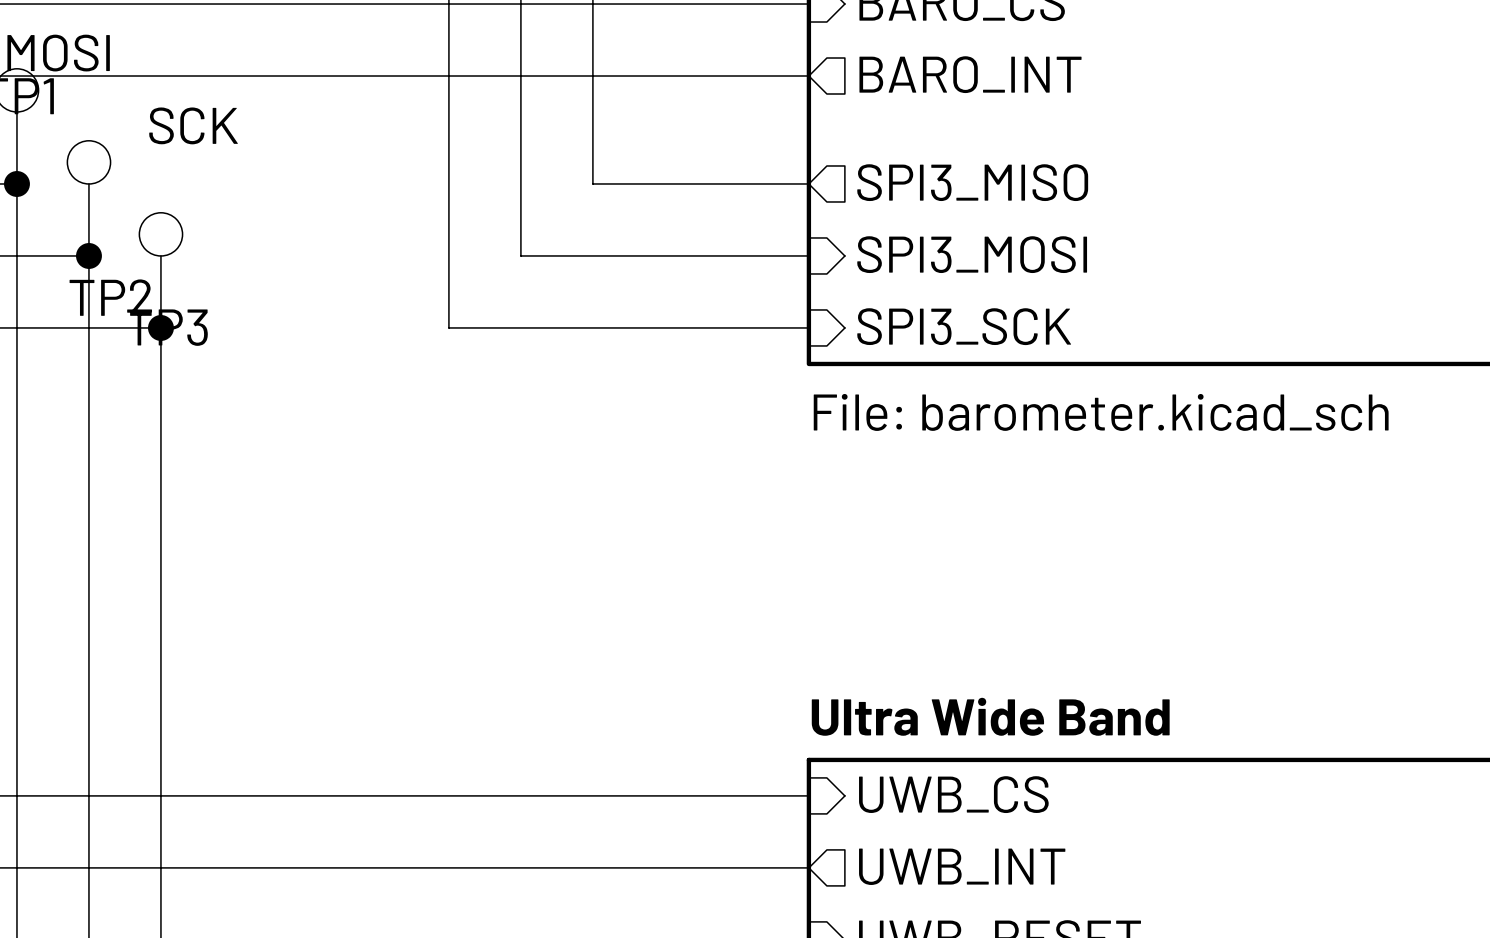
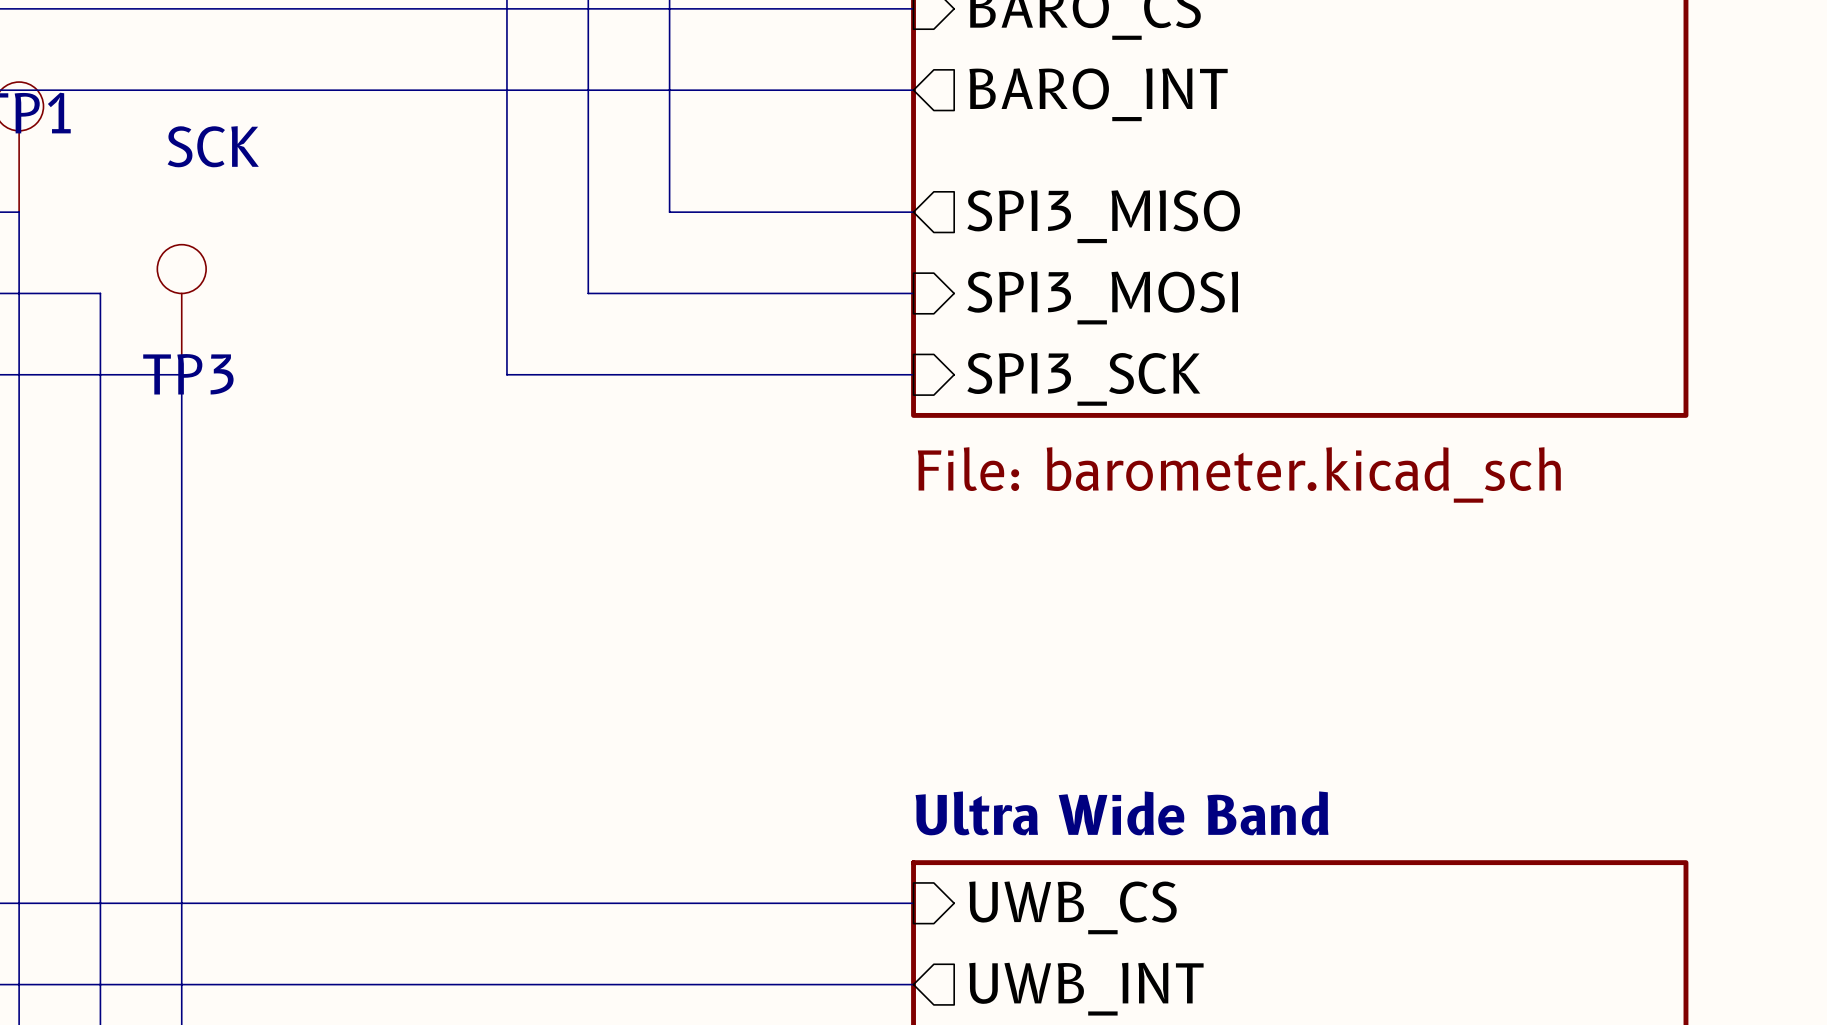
junction: (16, 183) -> none
TP2: MOSI (88, 198) -> none
junction: (88, 255) -> none
junction: (160, 327) -> none

